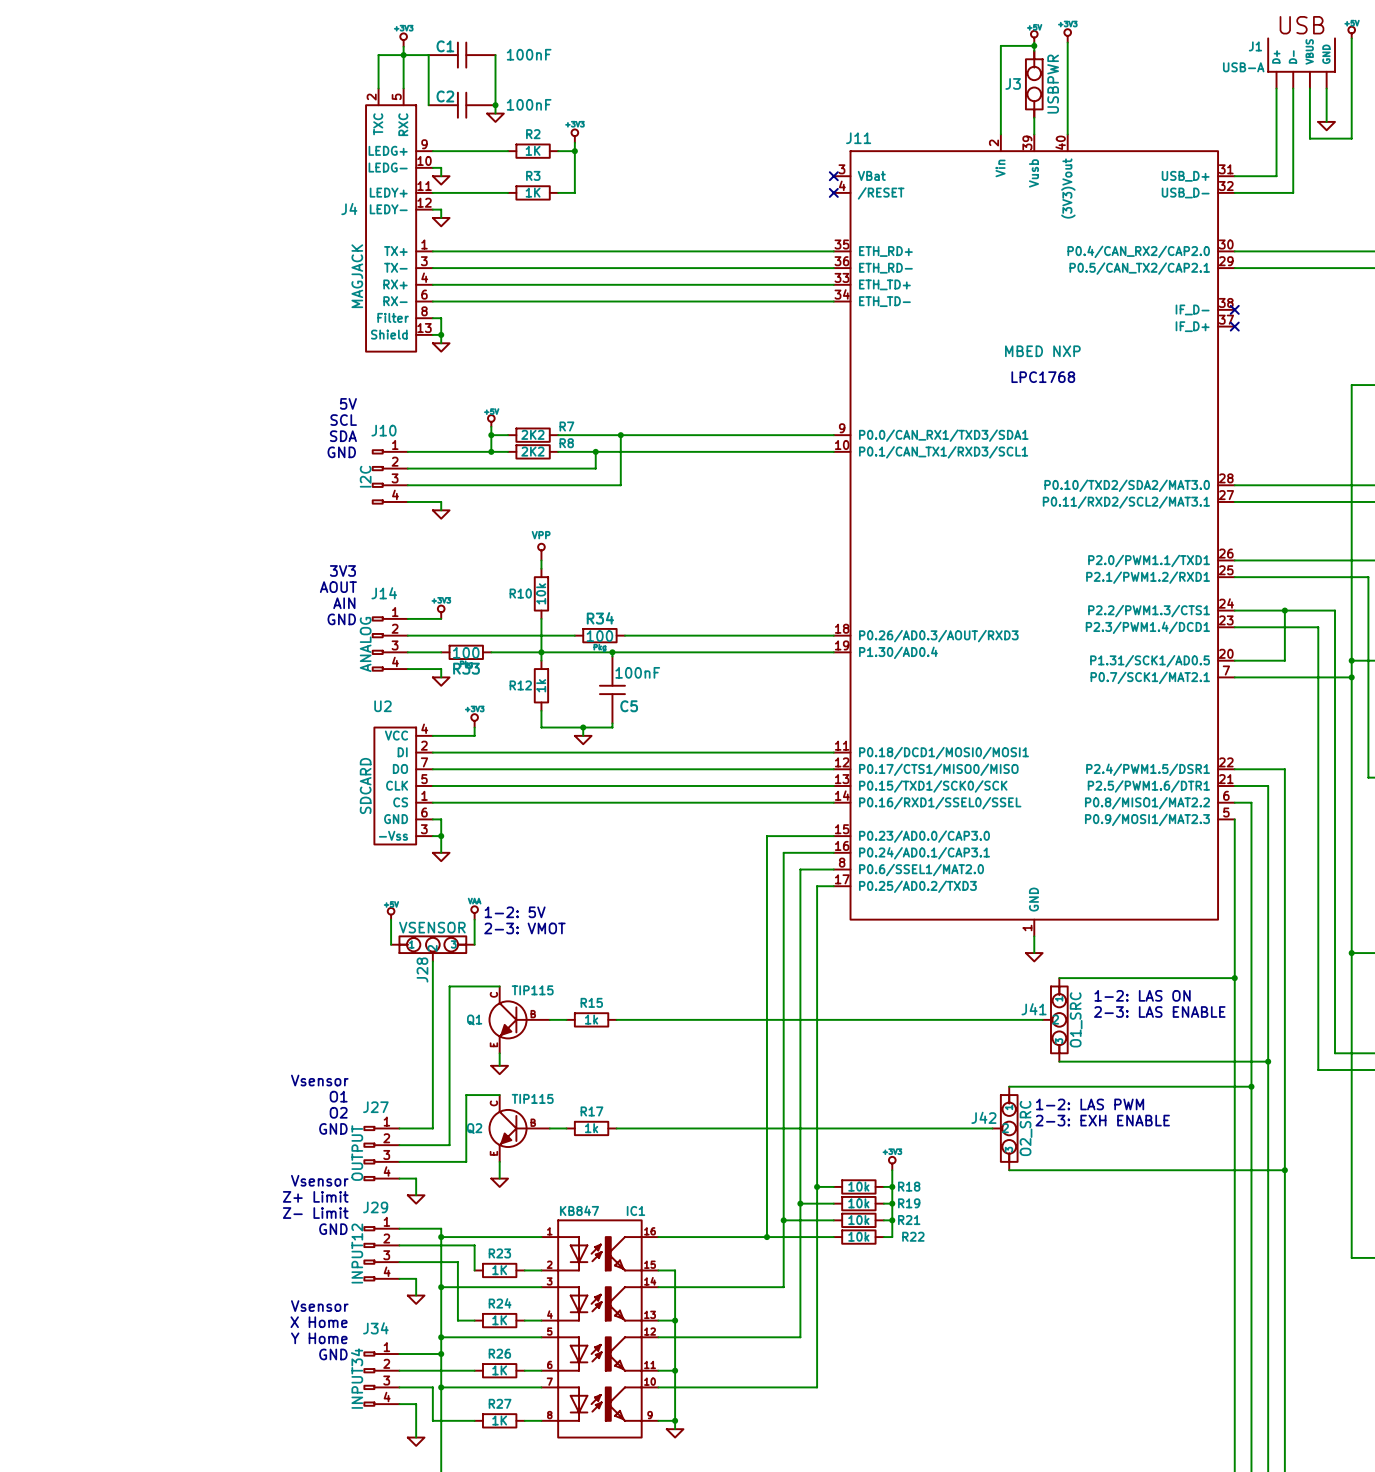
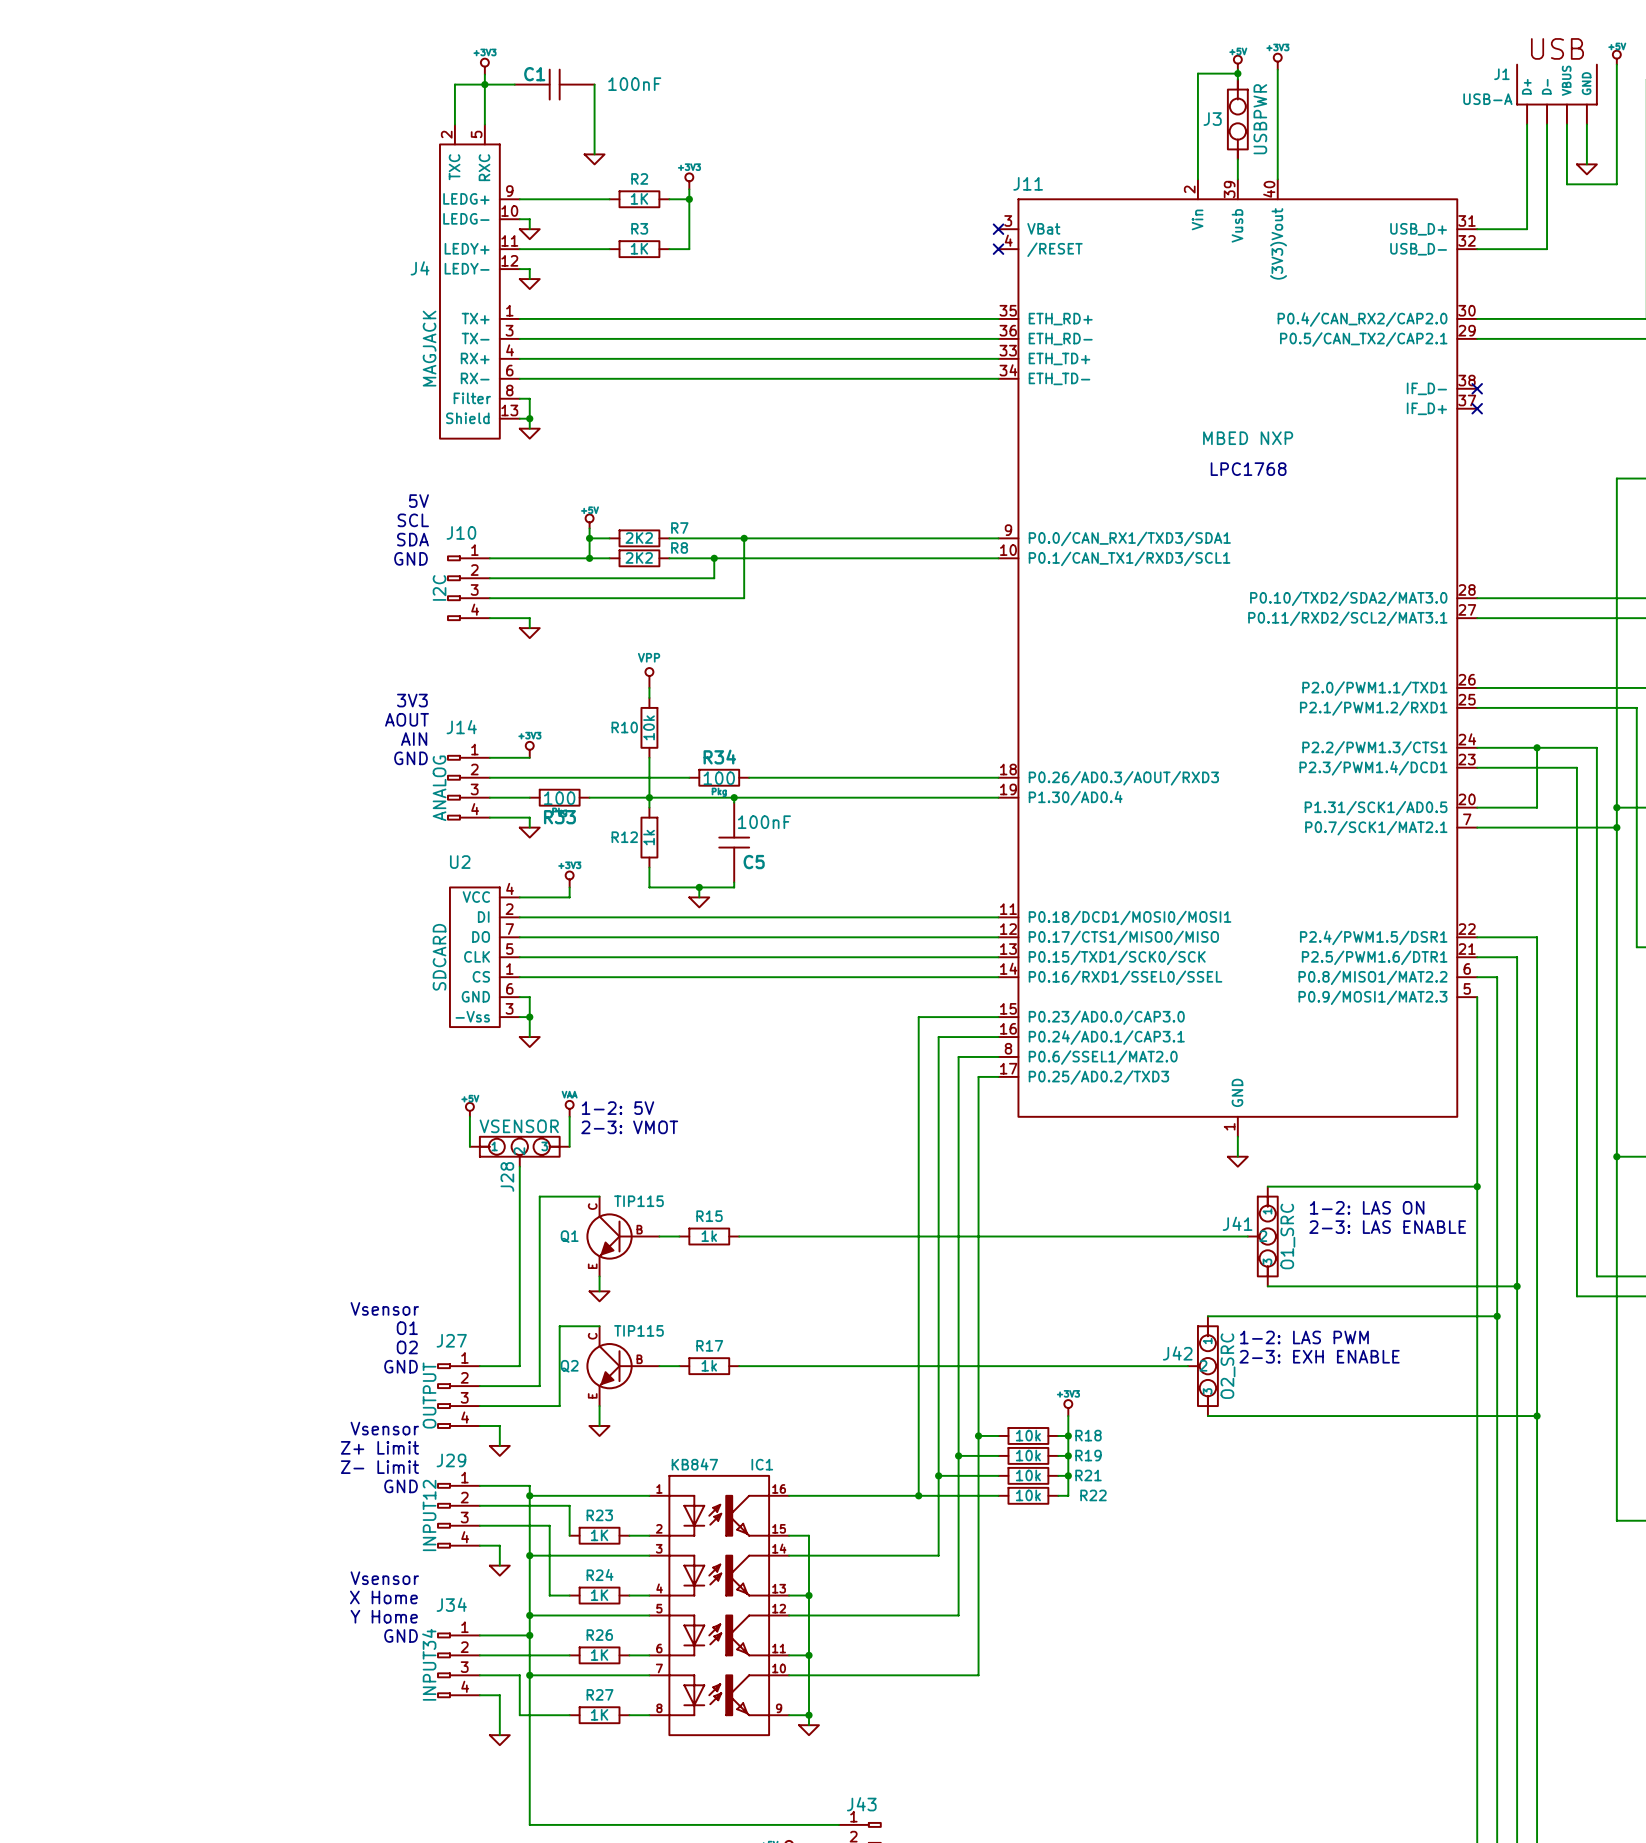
wire: (428, 55) (428, 105) -> none
C2: 100nF (462, 105) -> none
junction: (495, 105) -> none

